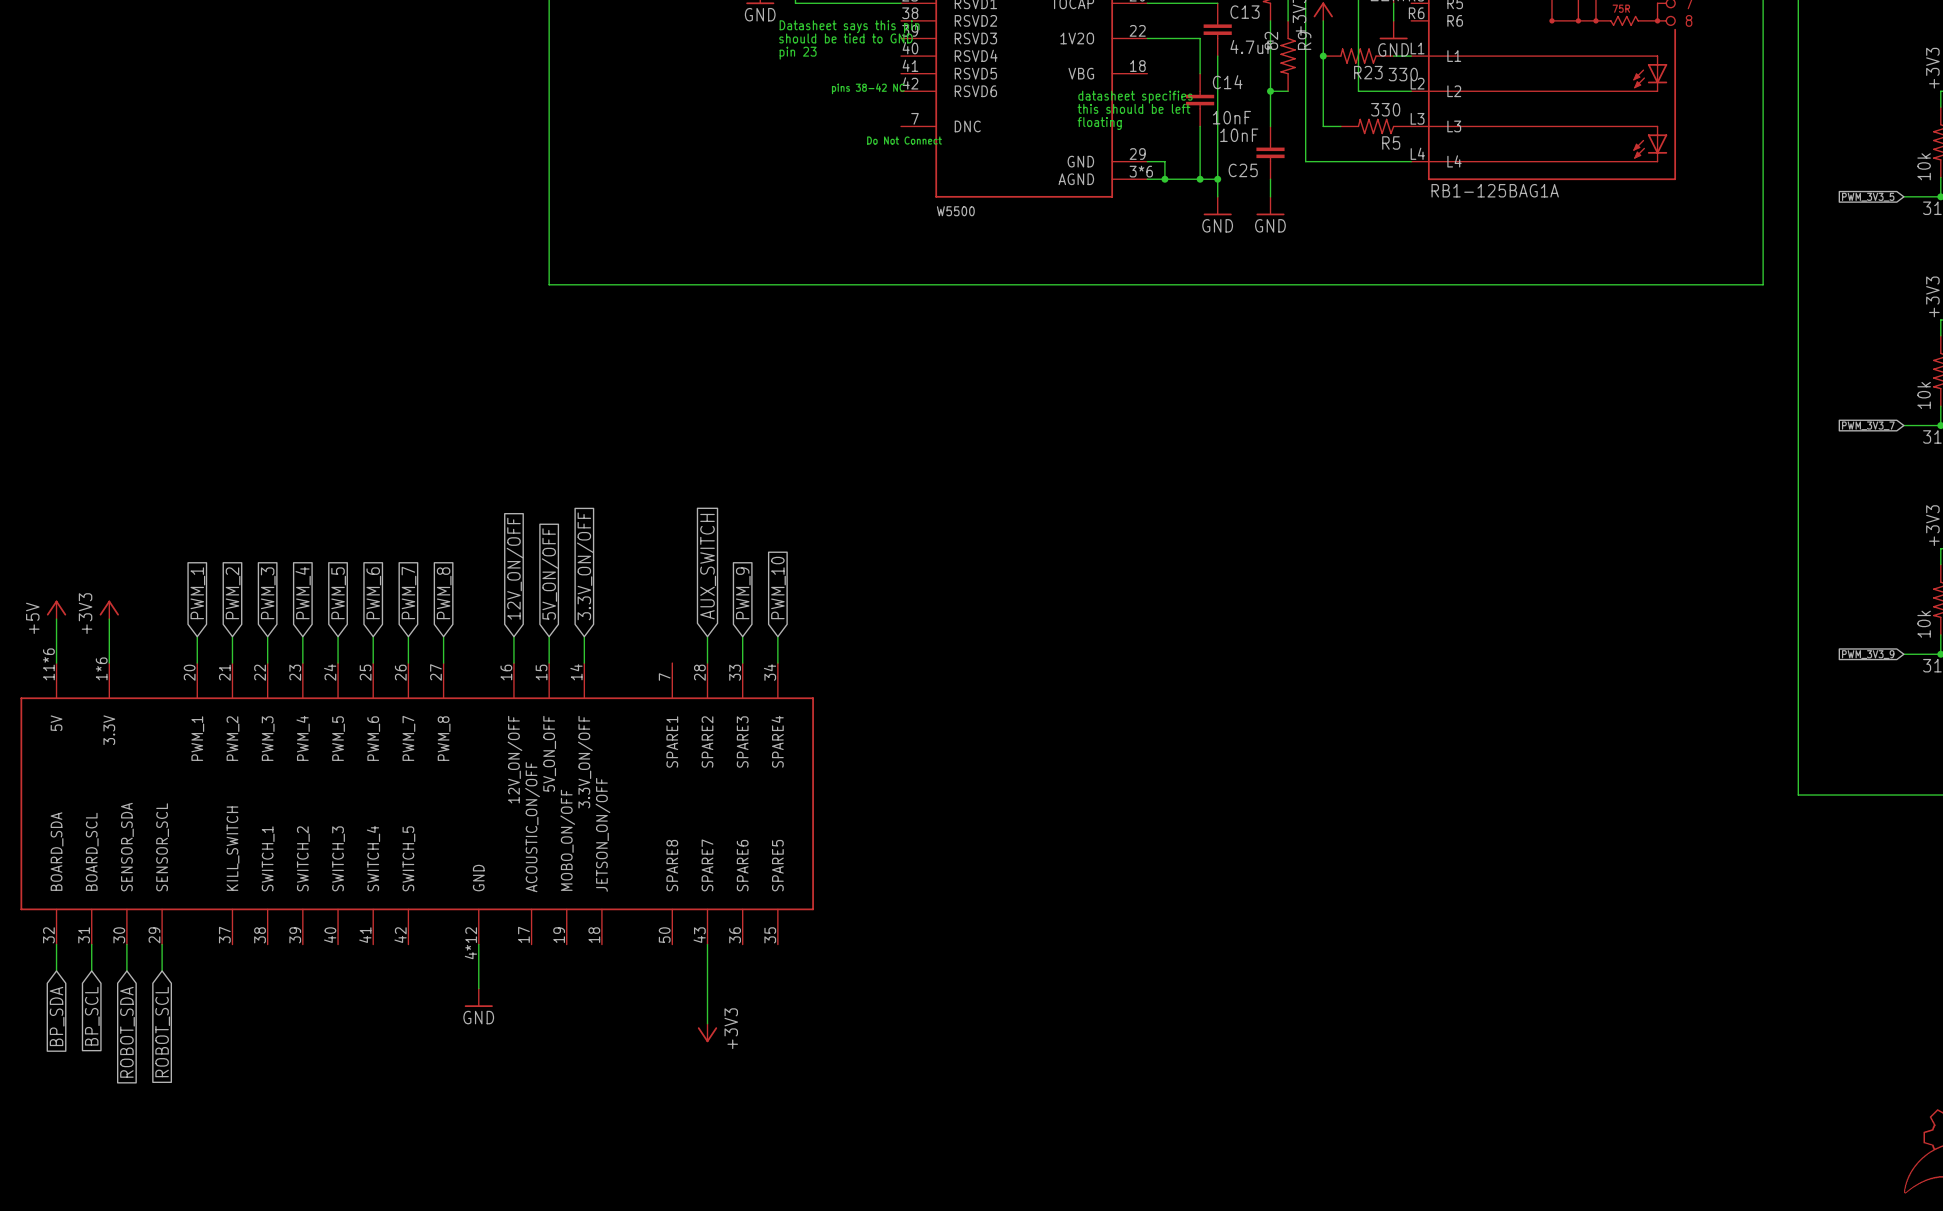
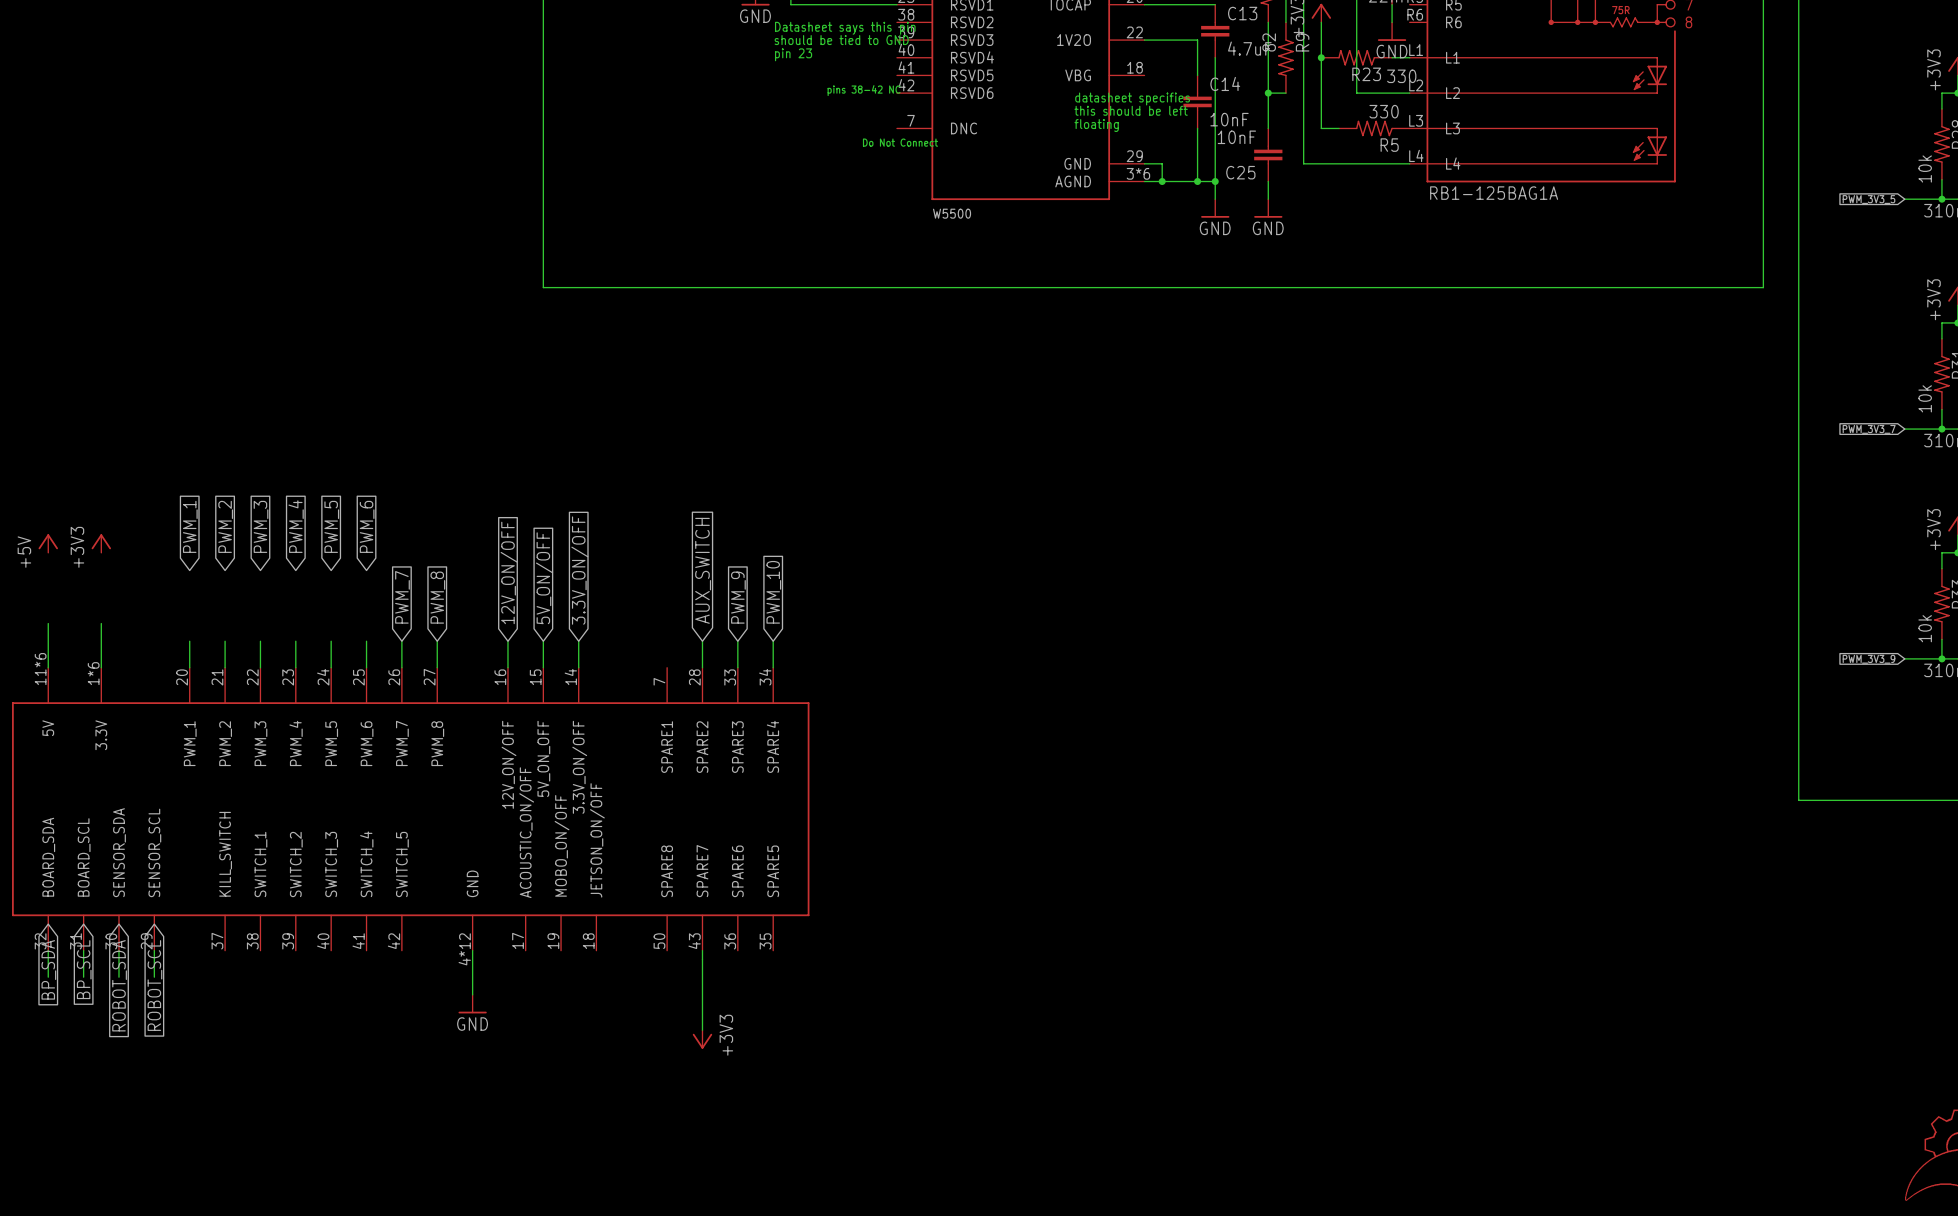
global label position: PWM_1 (197, 593) -> PWM_1 (190, 526)
global label position: PWM_2 (233, 593) -> PWM_2 (225, 526)
global label position: PWM_3 (268, 593) -> PWM_3 (261, 526)
global label position: PWM_4 (303, 593) -> PWM_4 (296, 526)
global label position: PWM_5 (338, 593) -> PWM_5 (331, 526)
global label position: PWM_6 (373, 593) -> PWM_6 (367, 526)
power symbol position: +5V (56, 609) -> +5V (48, 543)
power symbol position: +3V3 (109, 609) -> +3V3 (101, 543)
global label position: BP_SDA (57, 1016) -> BP_SDA (48, 969)
global label position: BP_SCL (92, 1016) -> BP_SCL (84, 969)
global label position: ROBOT_SDA (127, 1032) -> ROBOT_SDA (119, 985)
global label position: ROBOT_SCL (162, 1032) -> ROBOT_SCL (154, 985)

